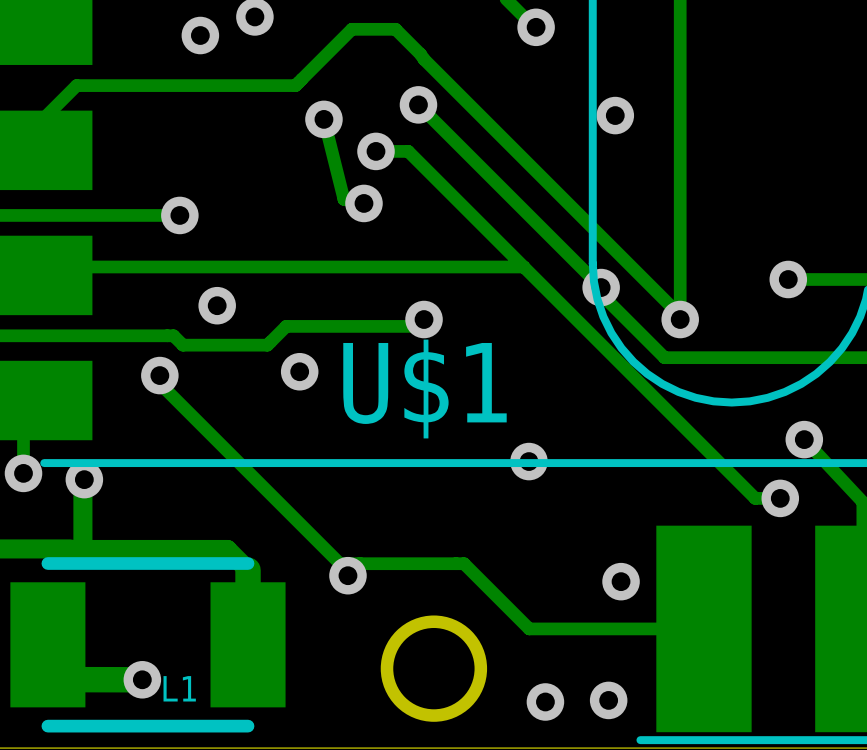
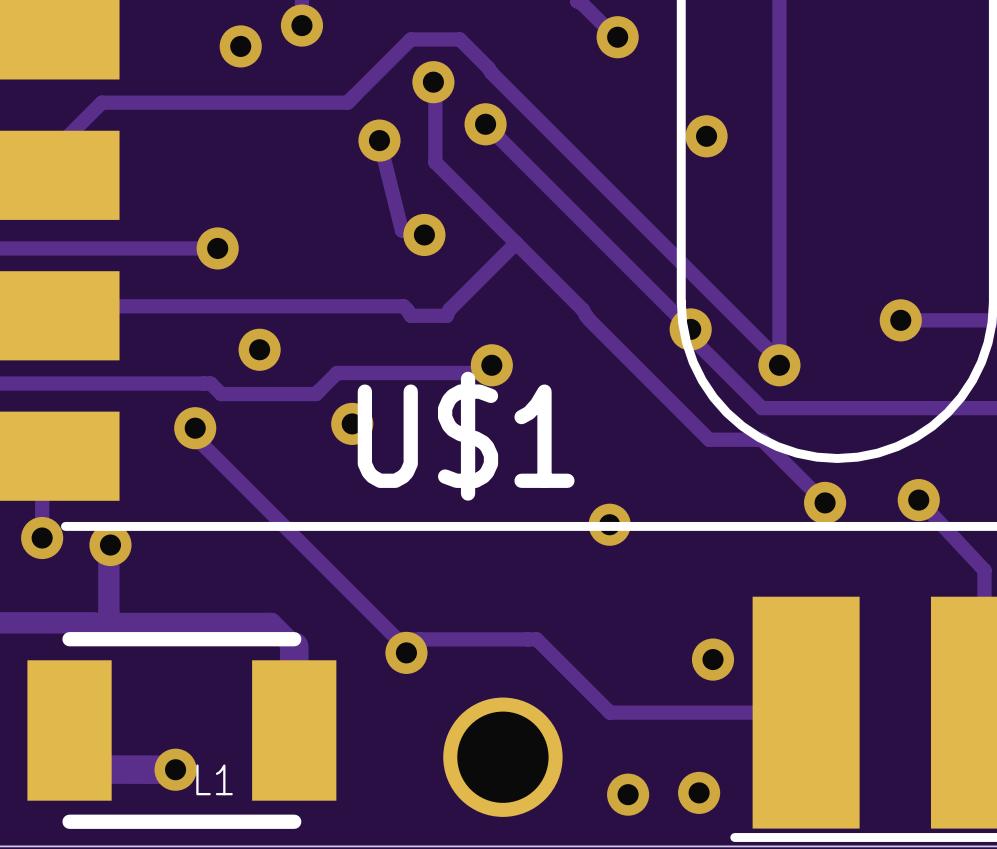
via: none -> (433, 82)
track: none -> (435, 85) (433, 82) (435, 92) (435, 162) (709, 439) (761, 439) (825, 502)
track: (375, 151) (408, 151) (755, 498) (780, 498) -> none
via: (375, 151) -> none
track: (523, 266) (345, 266) -> (516, 243) (449, 309) (446, 315) (410, 315) (403, 306)
via position: (780, 498) -> (825, 502)

